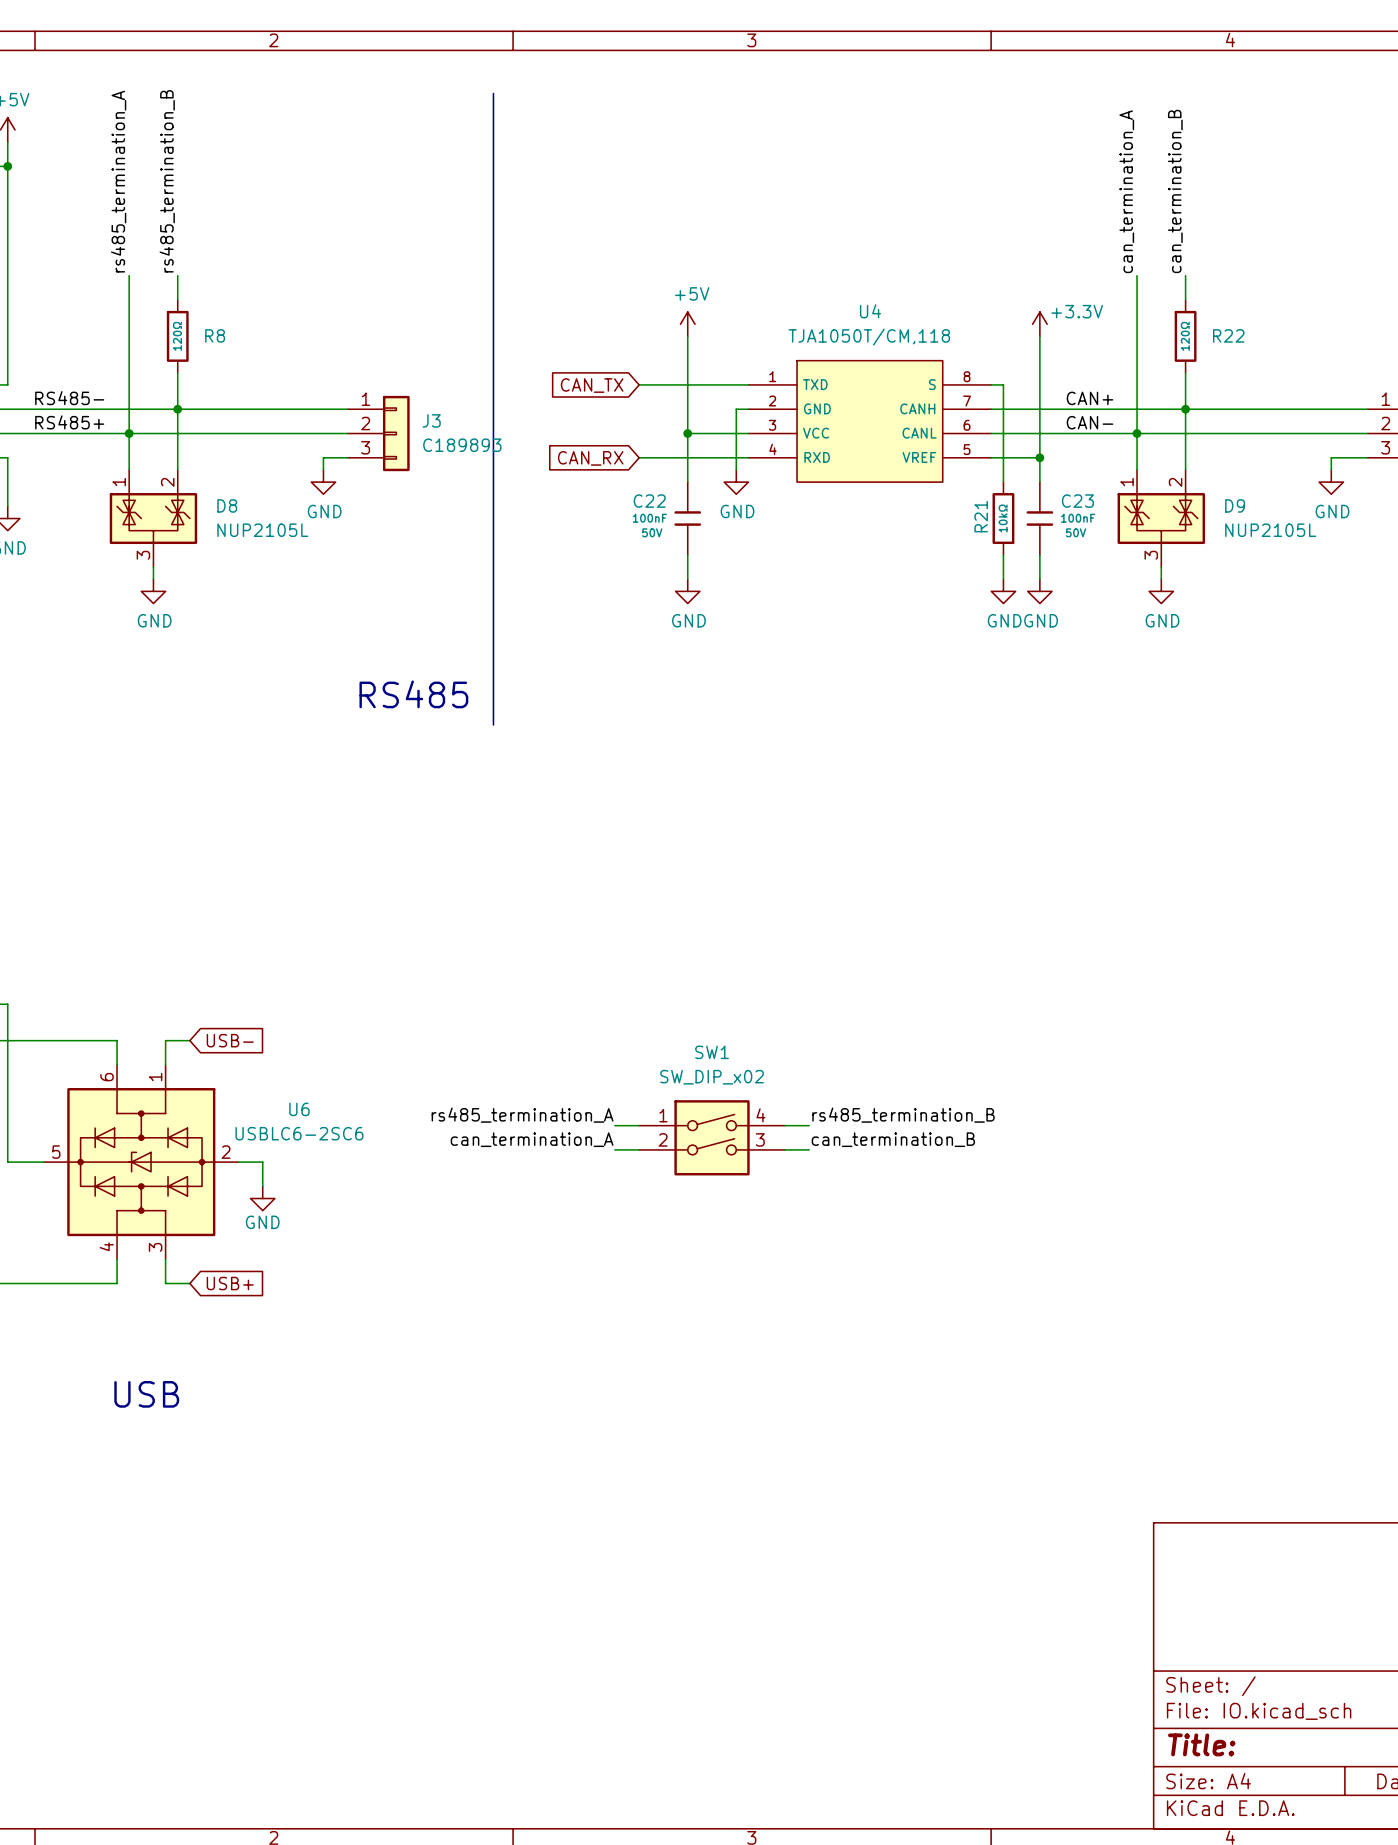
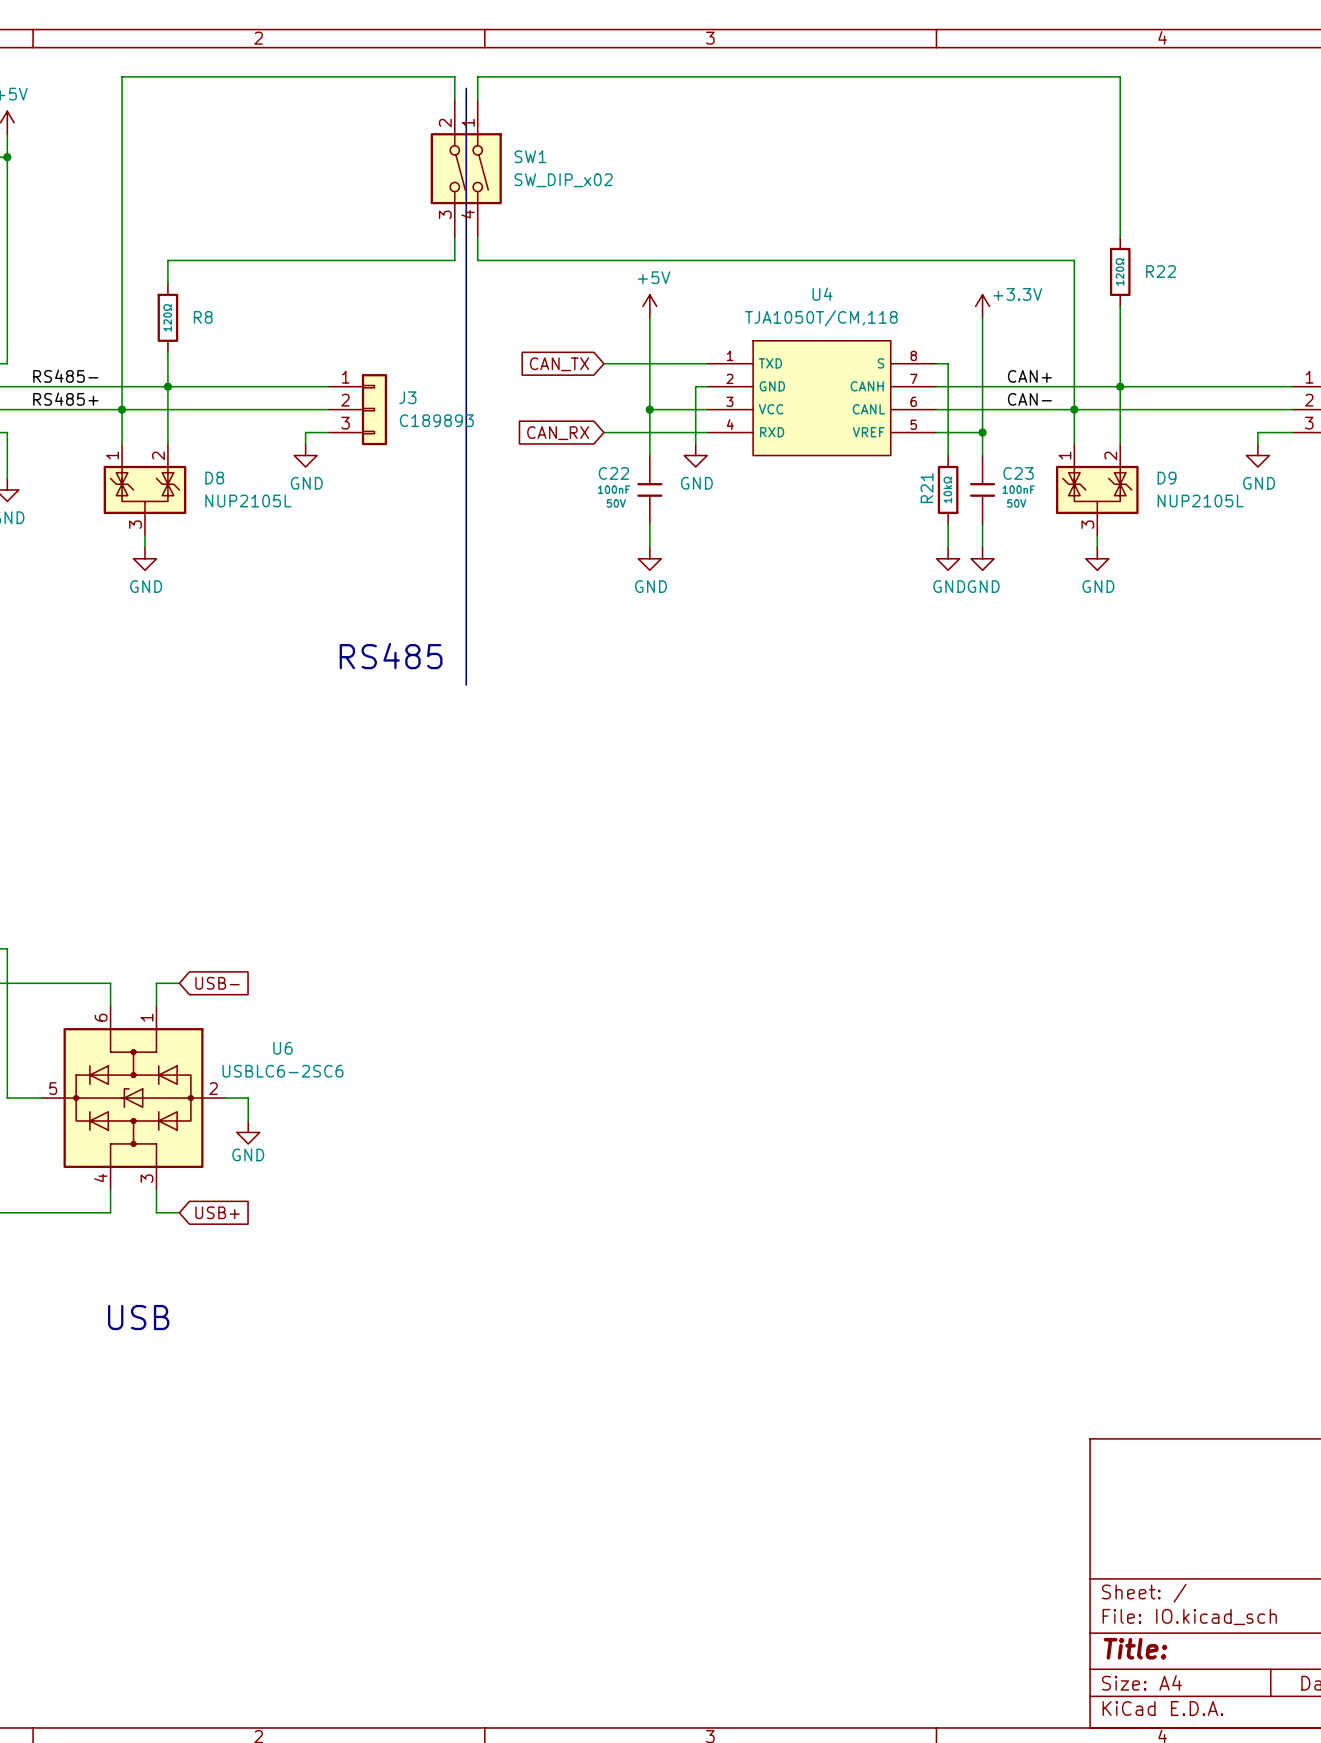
wire: none -> (454, 99) (454, 76) (122, 76) (122, 260)
wire: none -> (477, 99) (477, 76) (1120, 76) (1120, 237)
label: rs485_termination_A (118, 181) -> none
label: rs485_termination_B (167, 181) -> none
label: can_termination_A (1126, 191) -> none
label: can_termination_B (1175, 191) -> none
wire: none -> (454, 237) (454, 260) (167, 260)
wire: none -> (477, 237) (477, 260) (1074, 260)
wire: (1185, 275) (1185, 299) -> none
wire: none -> (1120, 306) (1120, 352)
R22 position: (1185, 336) -> (1120, 271)
SW1 value position: SW_DIP_x02 (712, 1077) -> SW_DIP_x02 (563, 180)
label: rs485_termination_A (522, 1115) -> none
label: rs485_termination_B (903, 1115) -> none
wire: (614, 1125) (639, 1125) -> none
wire: (784, 1125) (809, 1125) -> none
SW1 rotation: 0° (712, 1137) -> 90° clockwise (466, 168)
SW1 position: (712, 1137) -> (466, 168)
label: can_termination_A (532, 1139) -> none
label: can_termination_B (893, 1139) -> none
wire: (614, 1149) (639, 1149) -> none
wire: (784, 1149) (809, 1149) -> none

